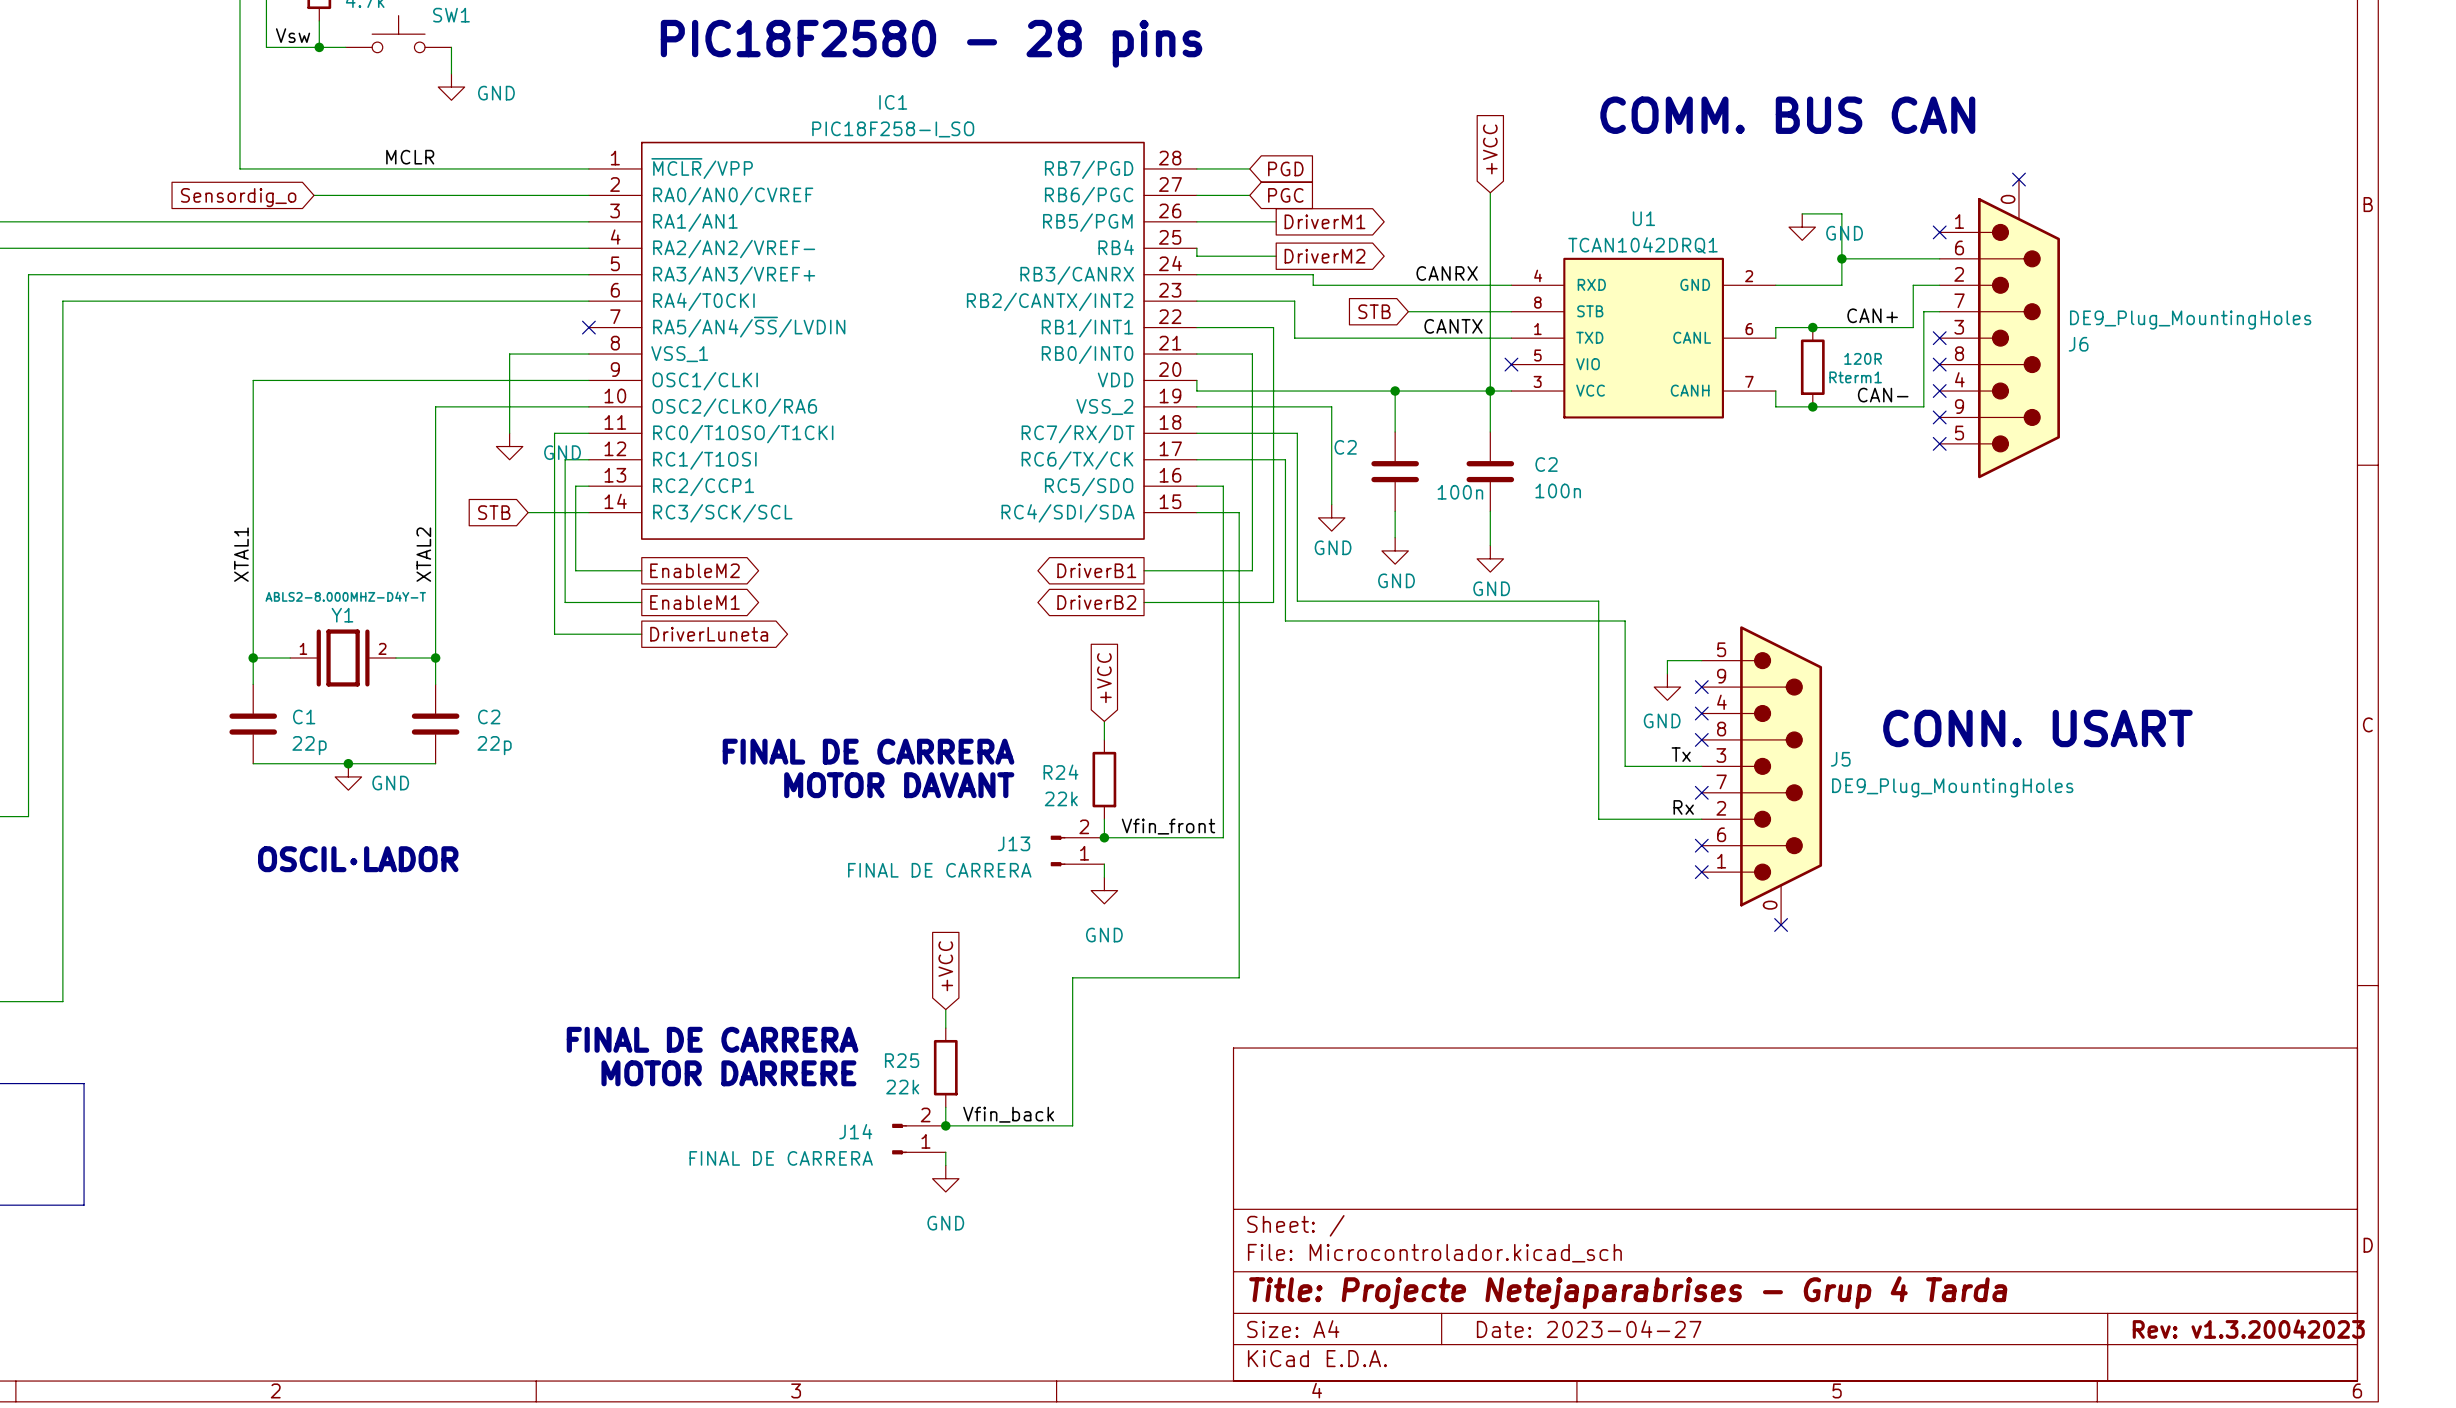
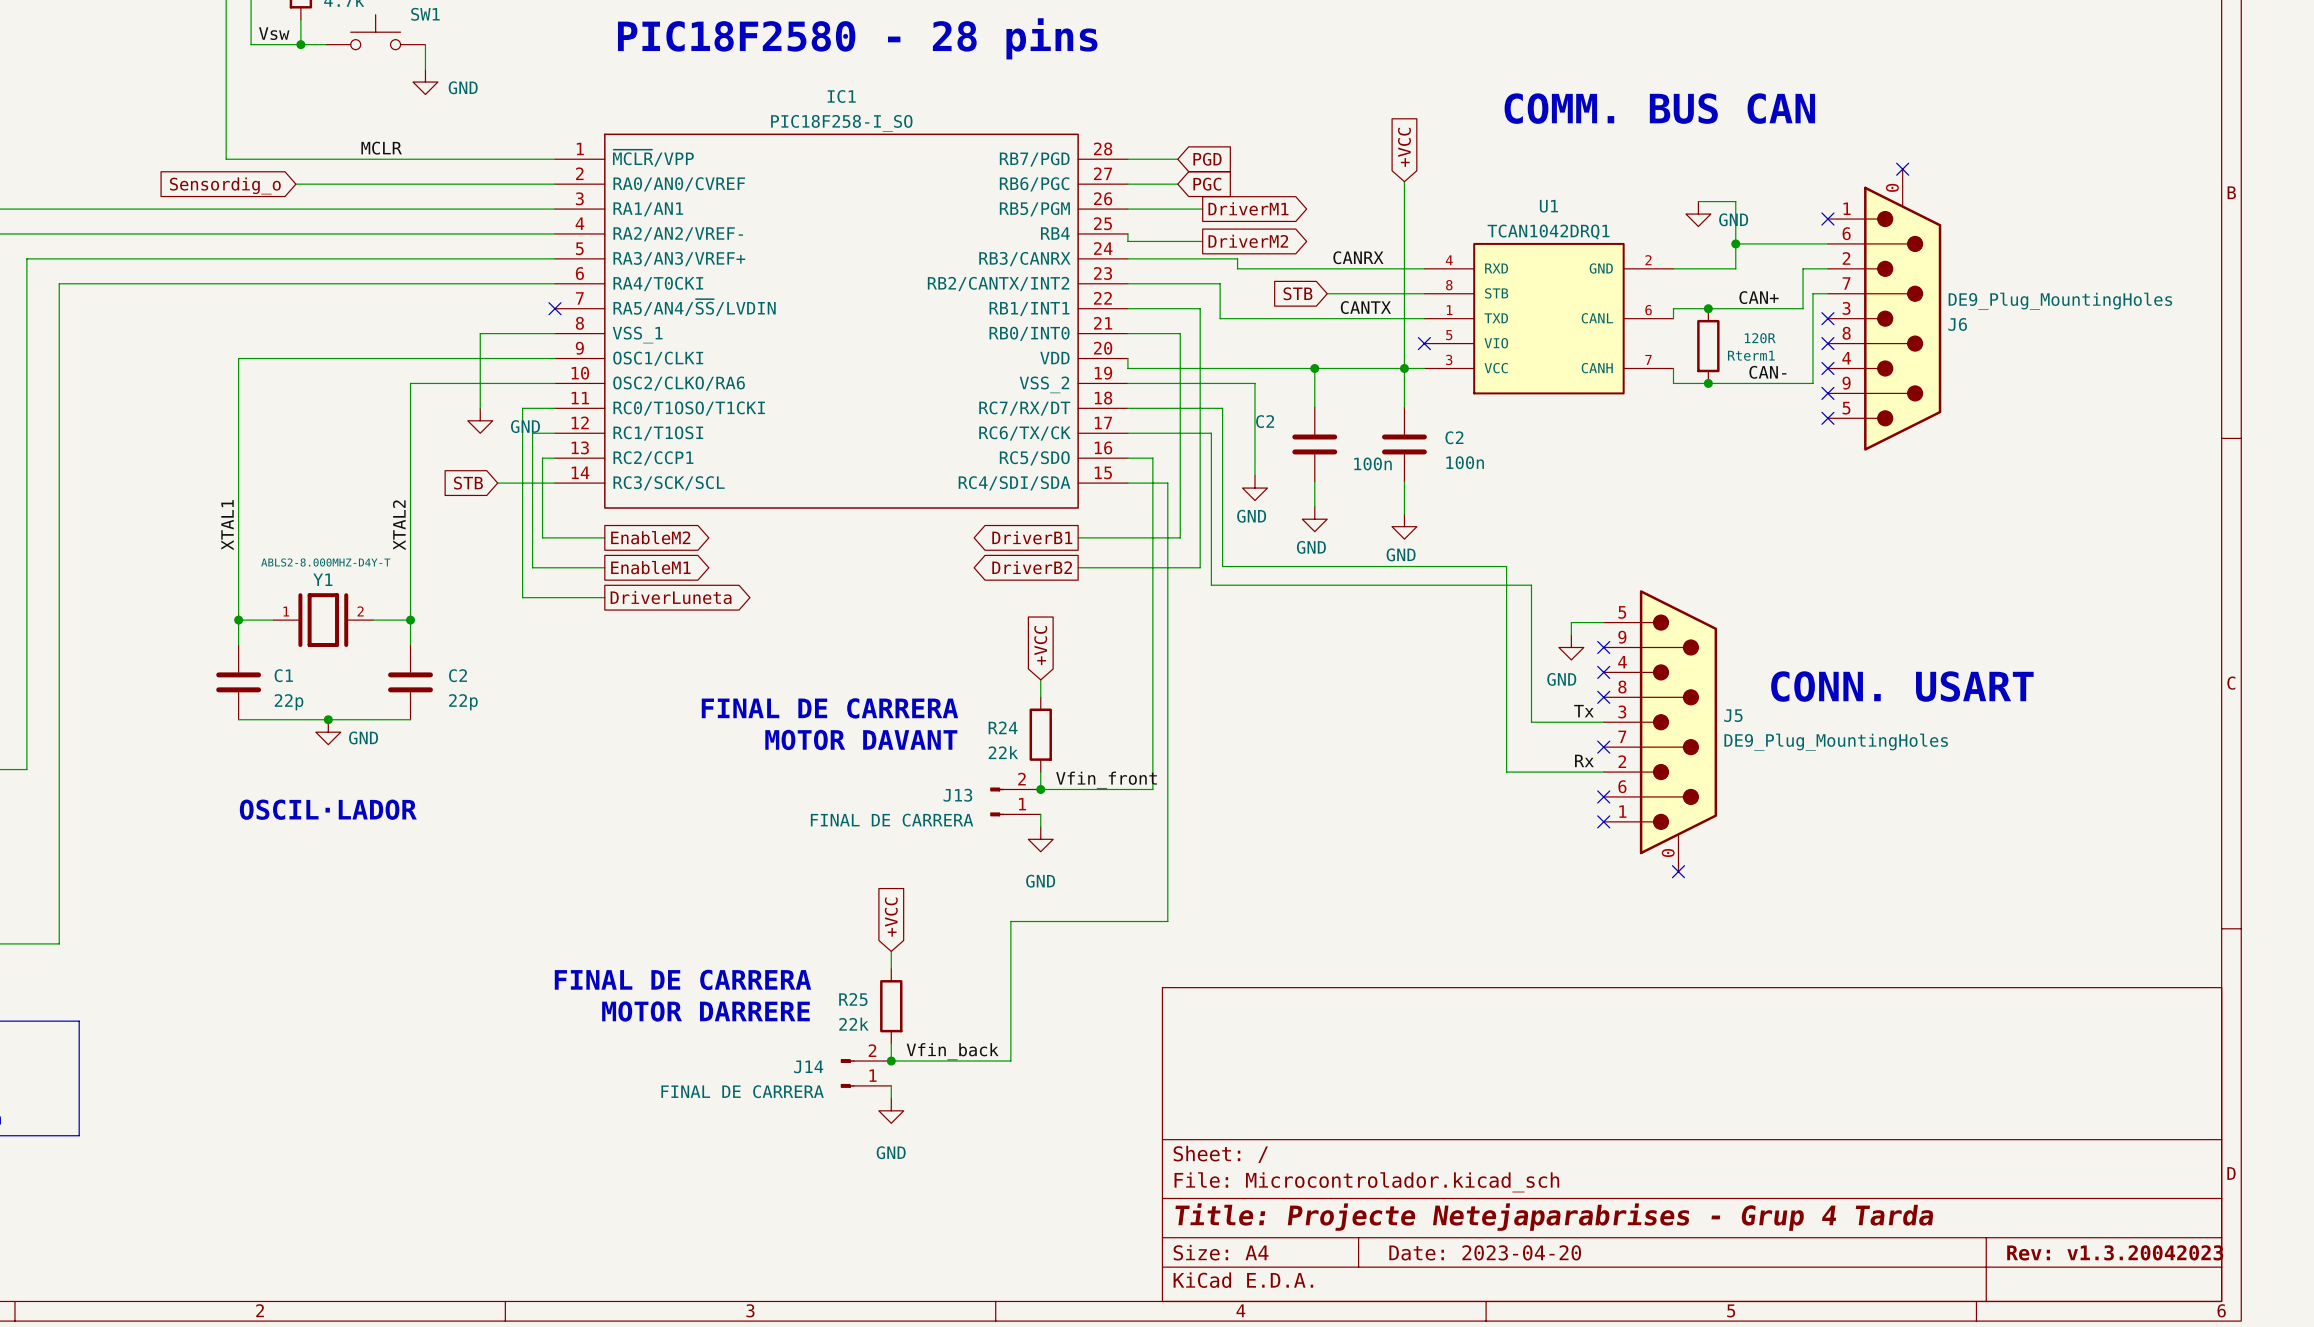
title block: Date: 2023-04-27 (1589, 1329) -> Date: 2023-04-20 (1485, 1252)

